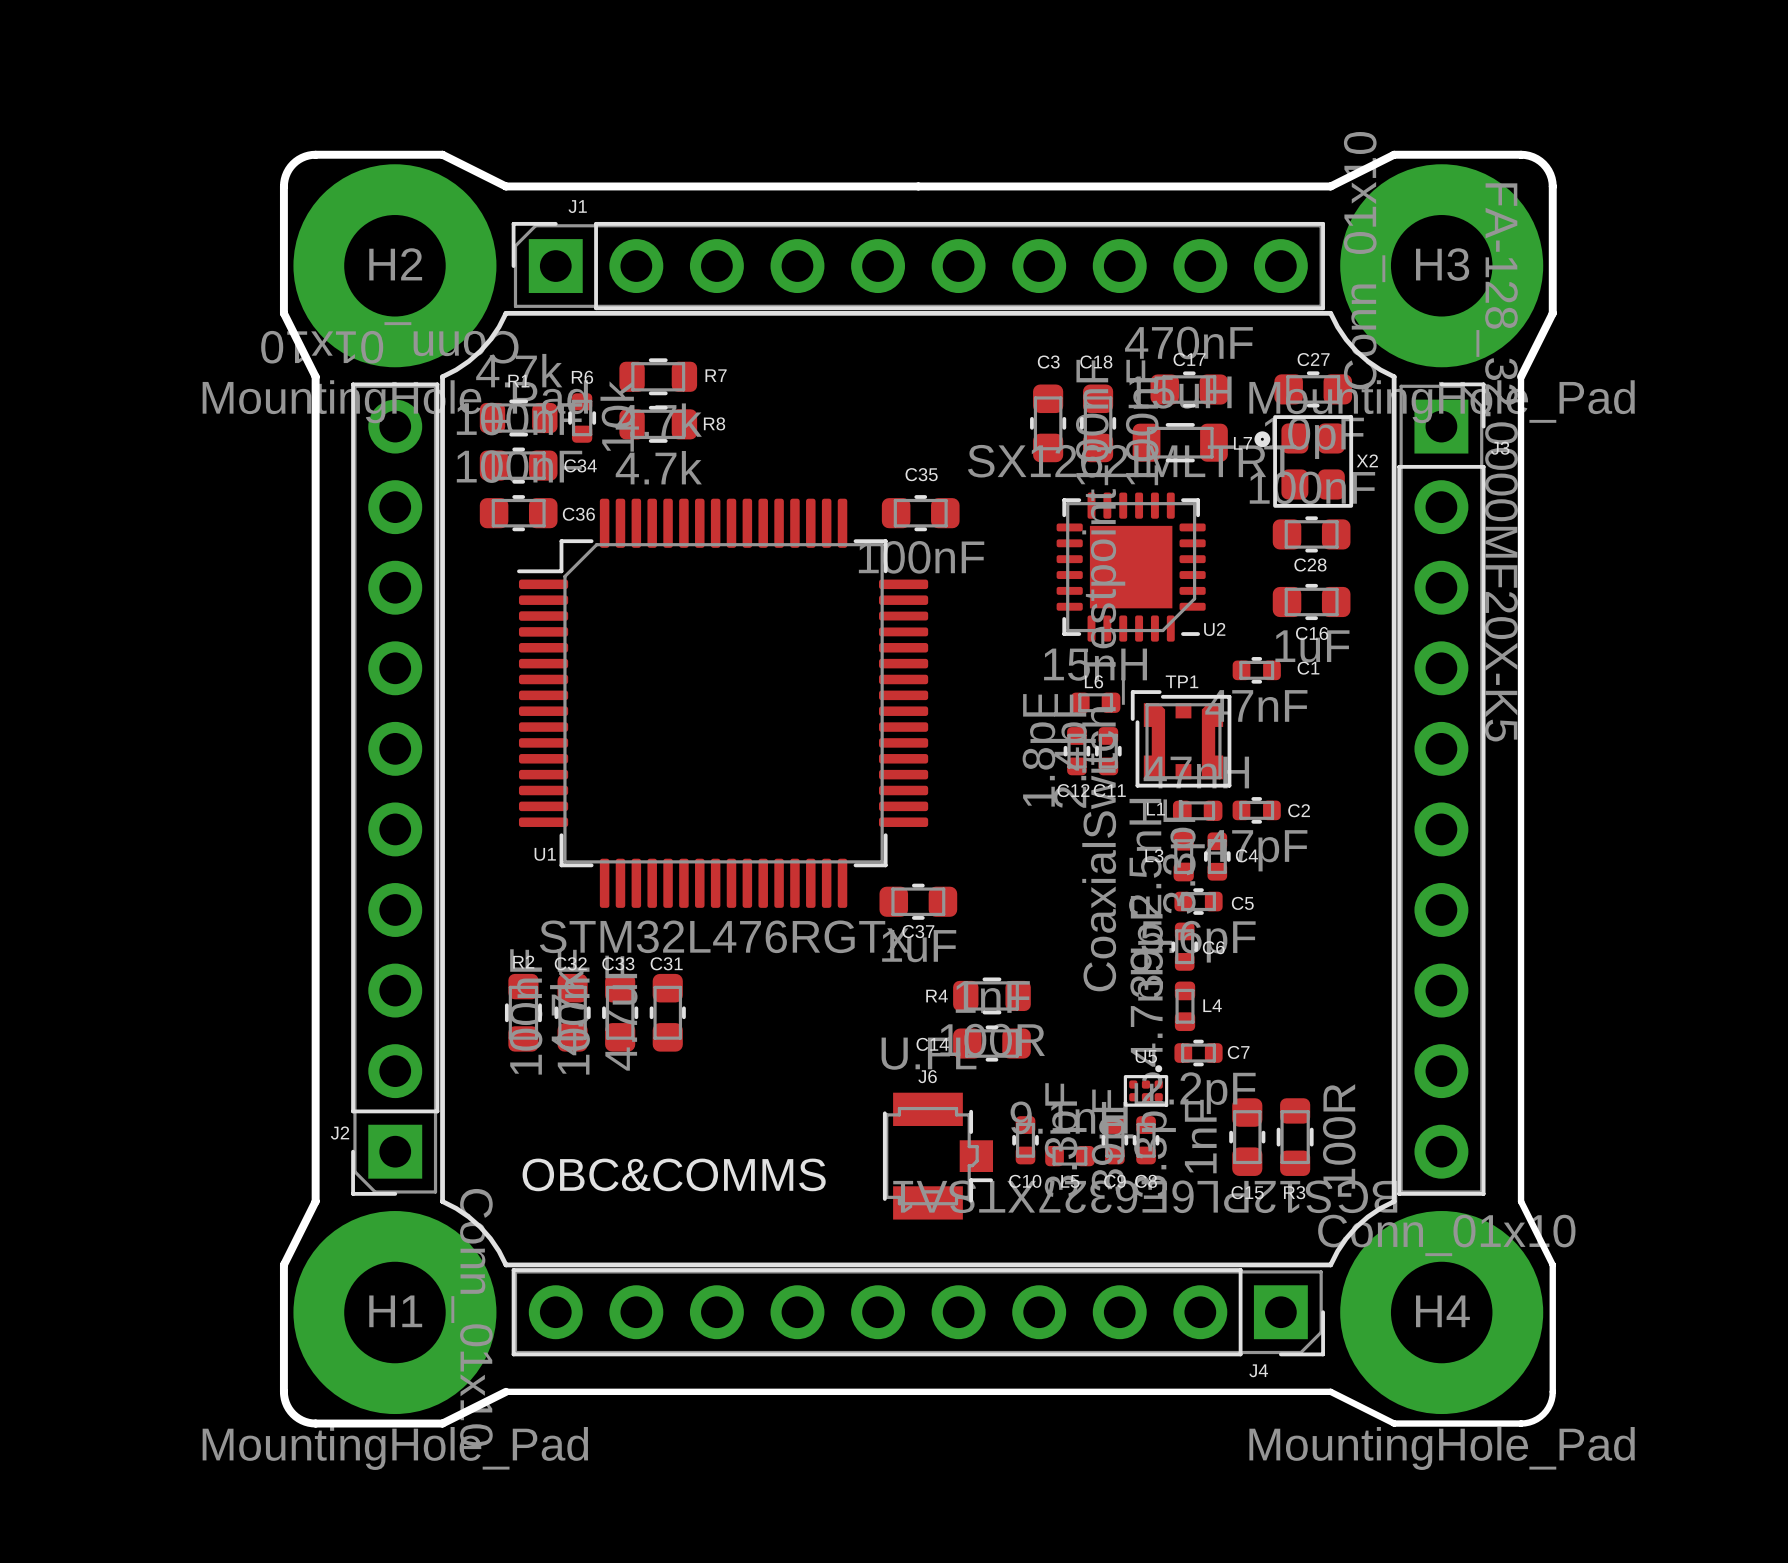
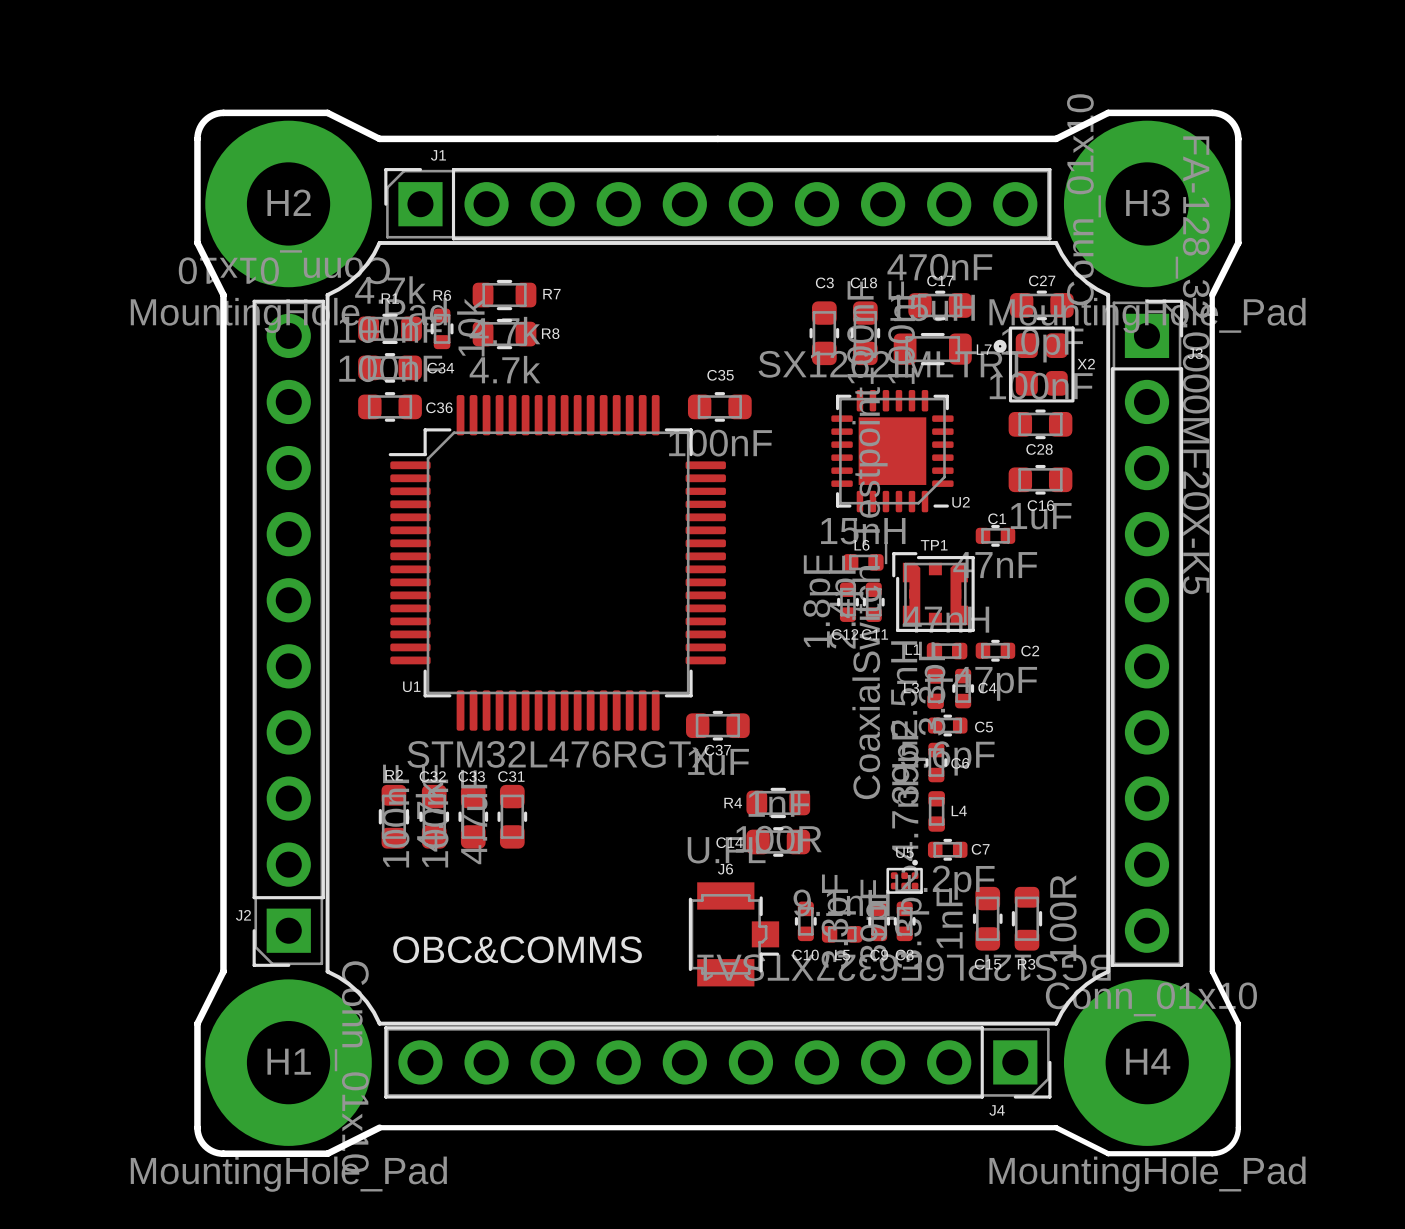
C1 name position: C1 (1308, 668) -> C1 (997, 518)

